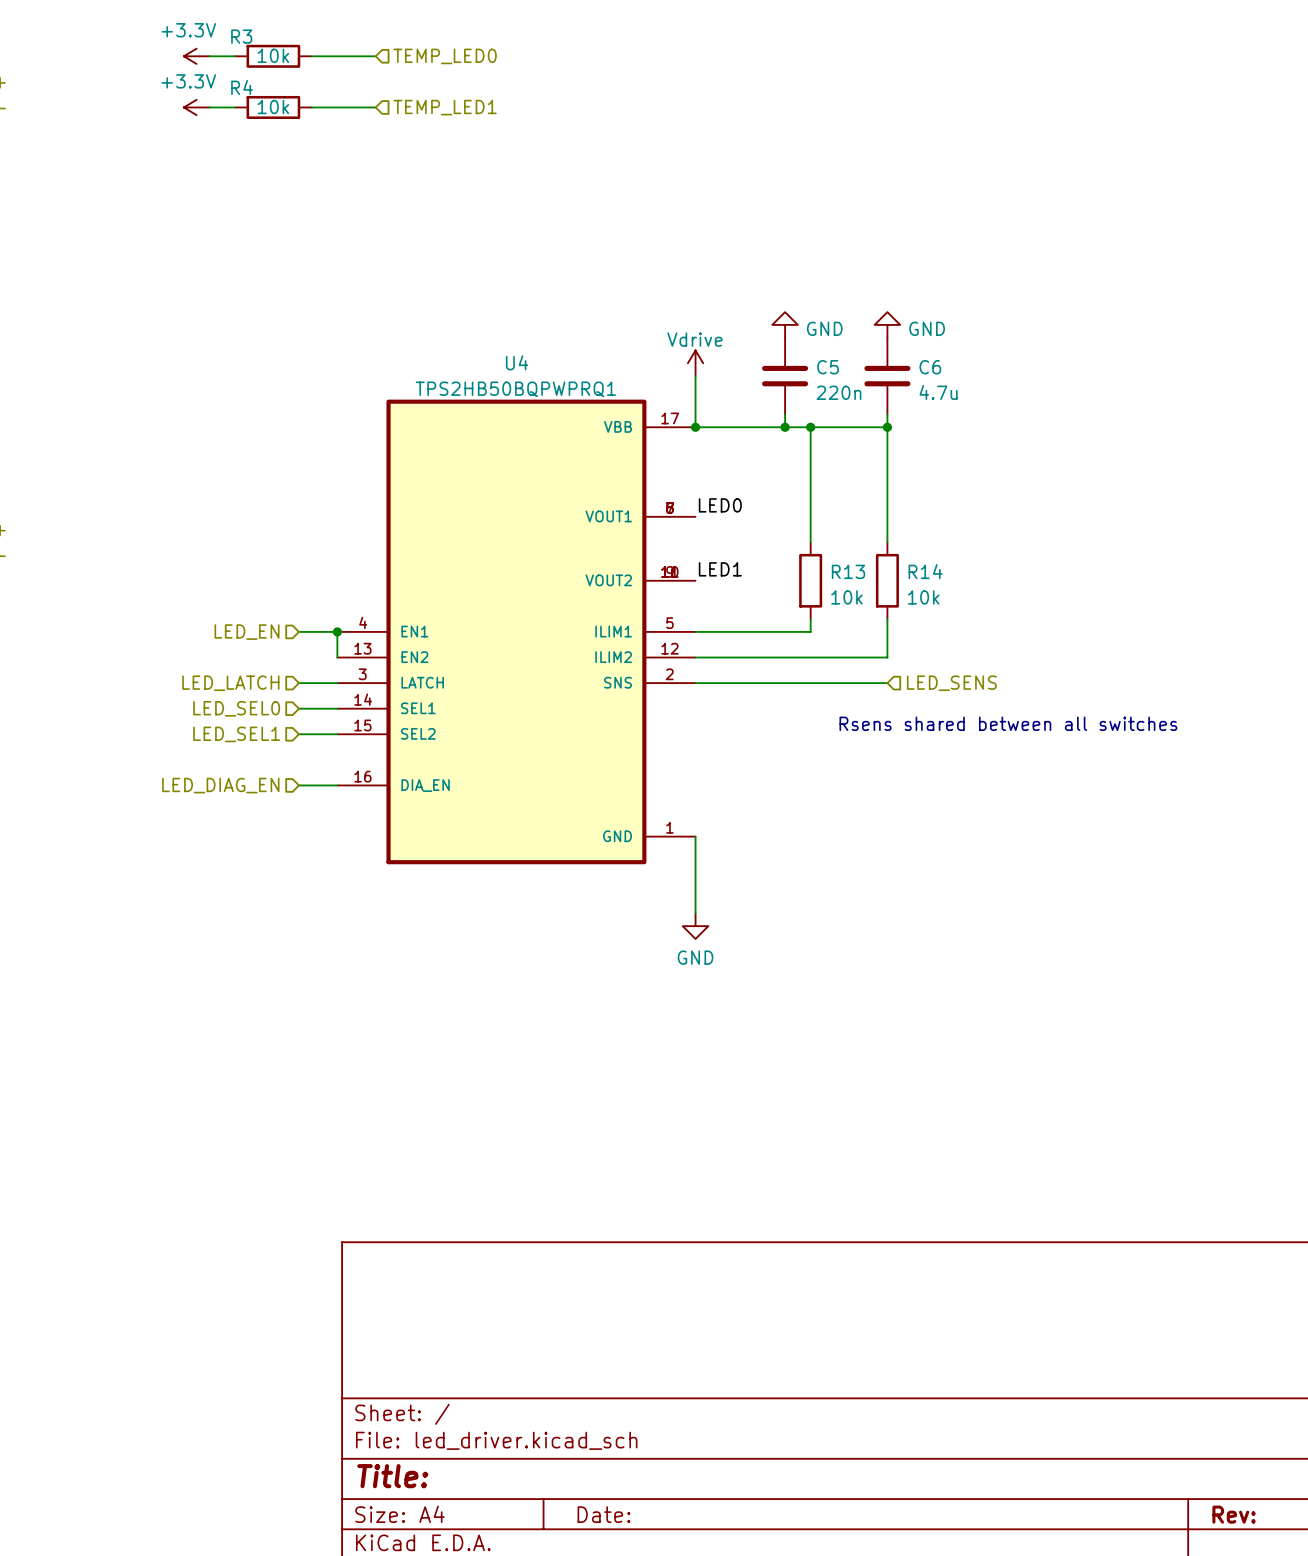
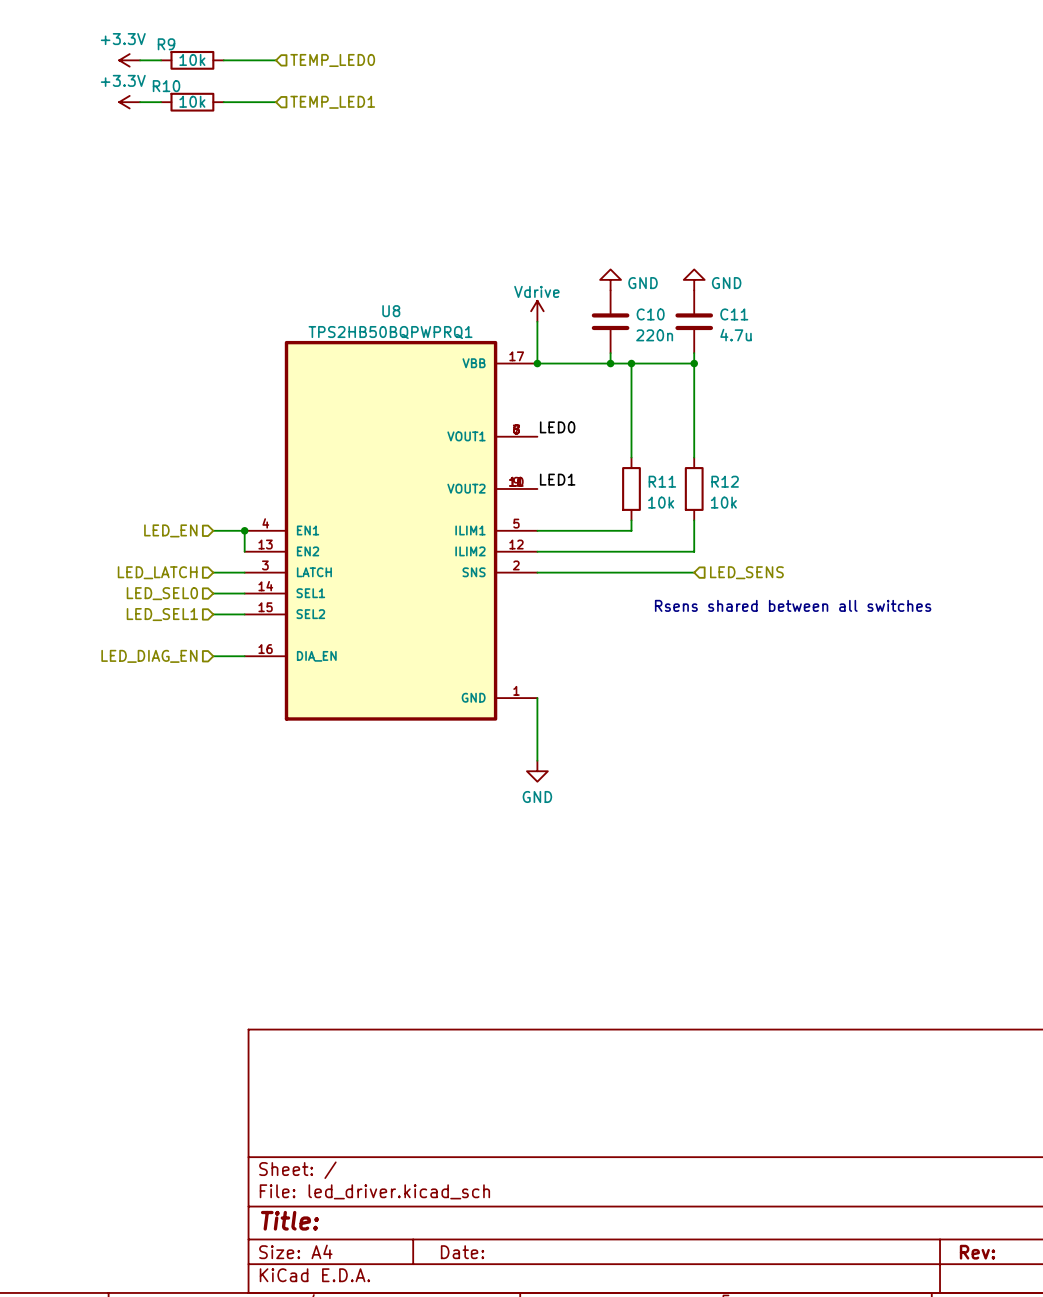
R3 name: R3 (241, 36) -> R9 (166, 44)
R4 name: R4 (242, 87) -> R10 (166, 86)
U4 name: U4 (517, 362) -> U8 (391, 311)
C5 name: C5 (828, 367) -> C10 (650, 314)
C6 name: C6 (930, 367) -> C11 (734, 314)
R13 name: R13 (848, 571) -> R11 (662, 481)
R14 name: R14 (925, 571) -> R12 (725, 481)

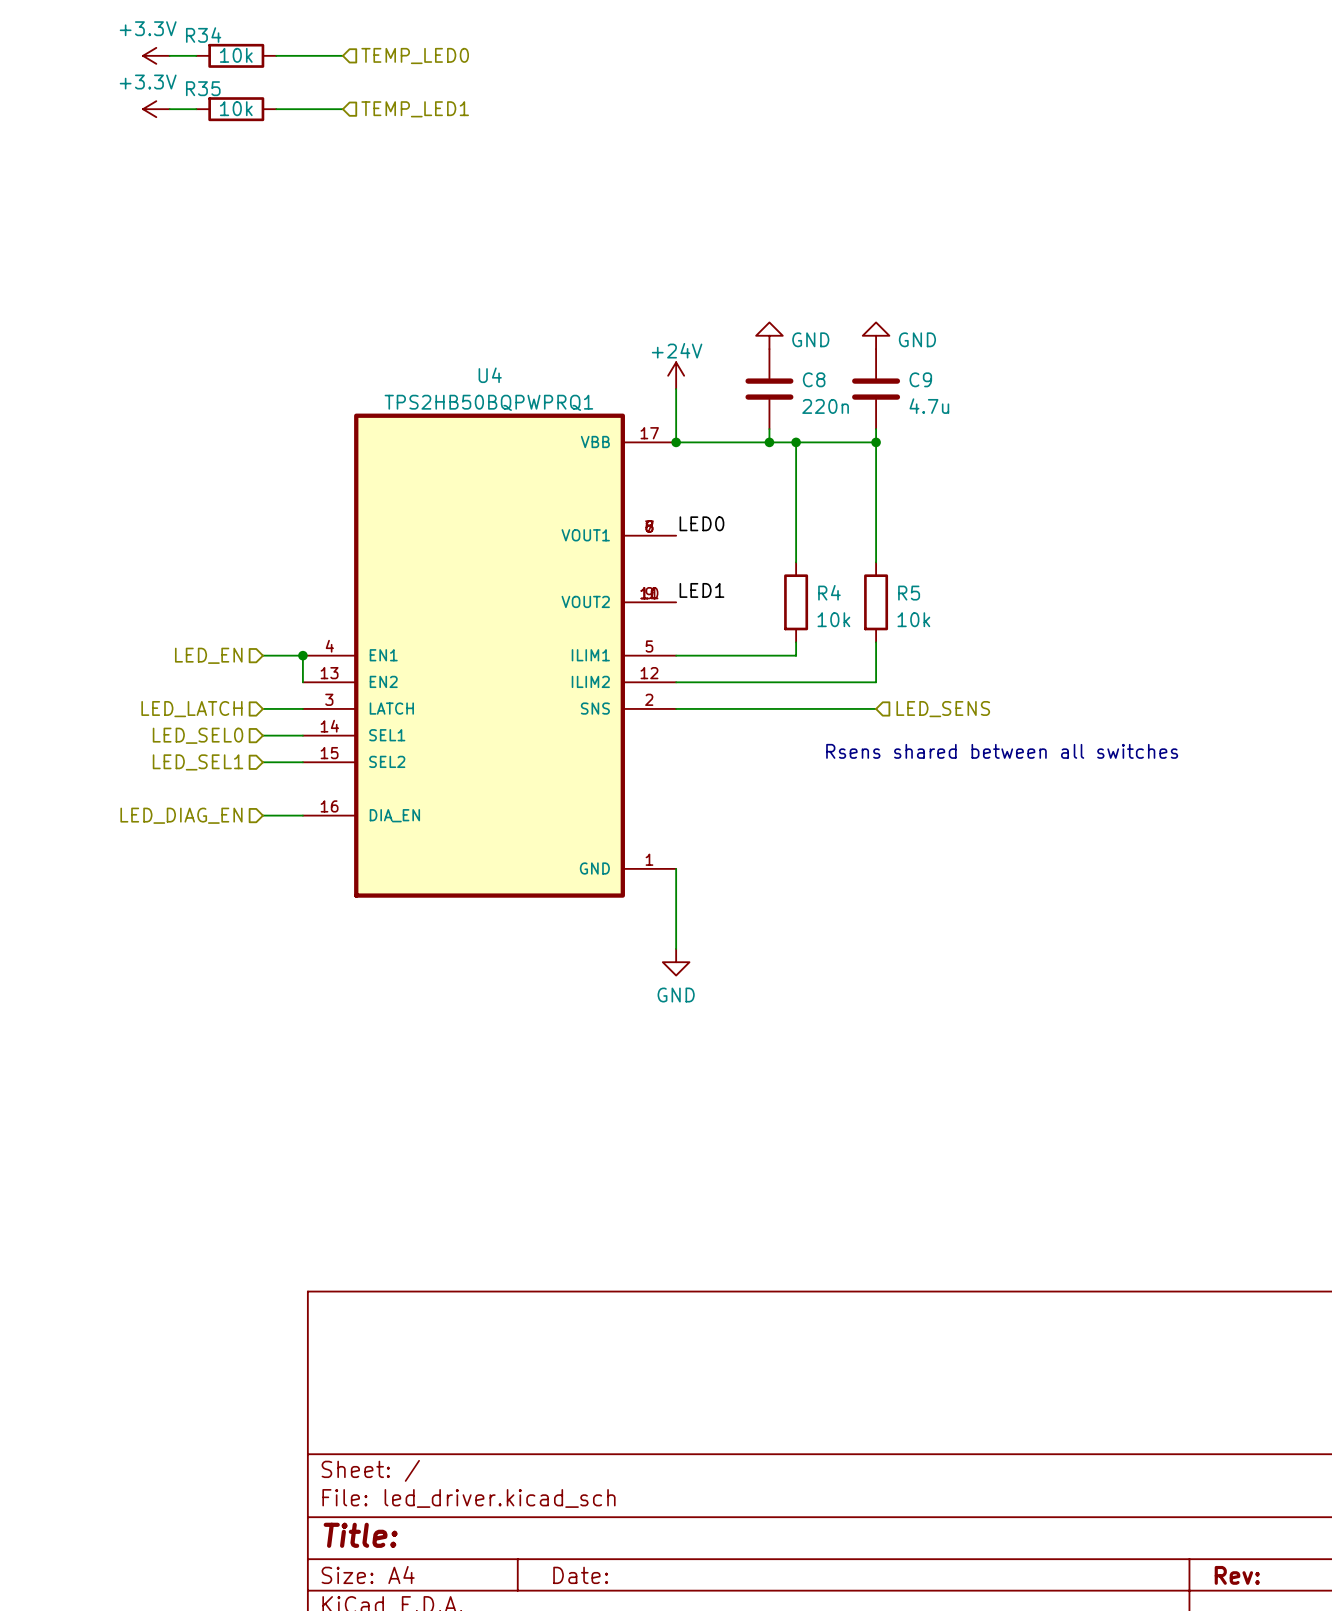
R9 name: R9 (166, 44) -> R34 (203, 35)
R10 name: R10 (166, 86) -> R35 (203, 88)
U8 name: U8 (391, 311) -> U4 (490, 375)
power symbol: Vdrive (537, 311) -> +24V (676, 375)
C10 name: C10 (650, 314) -> C8 (814, 379)
C11 name: C11 (734, 314) -> C9 (920, 379)
R11 name: R11 (662, 481) -> R4 (829, 592)
R12 name: R12 (725, 481) -> R5 (909, 593)

